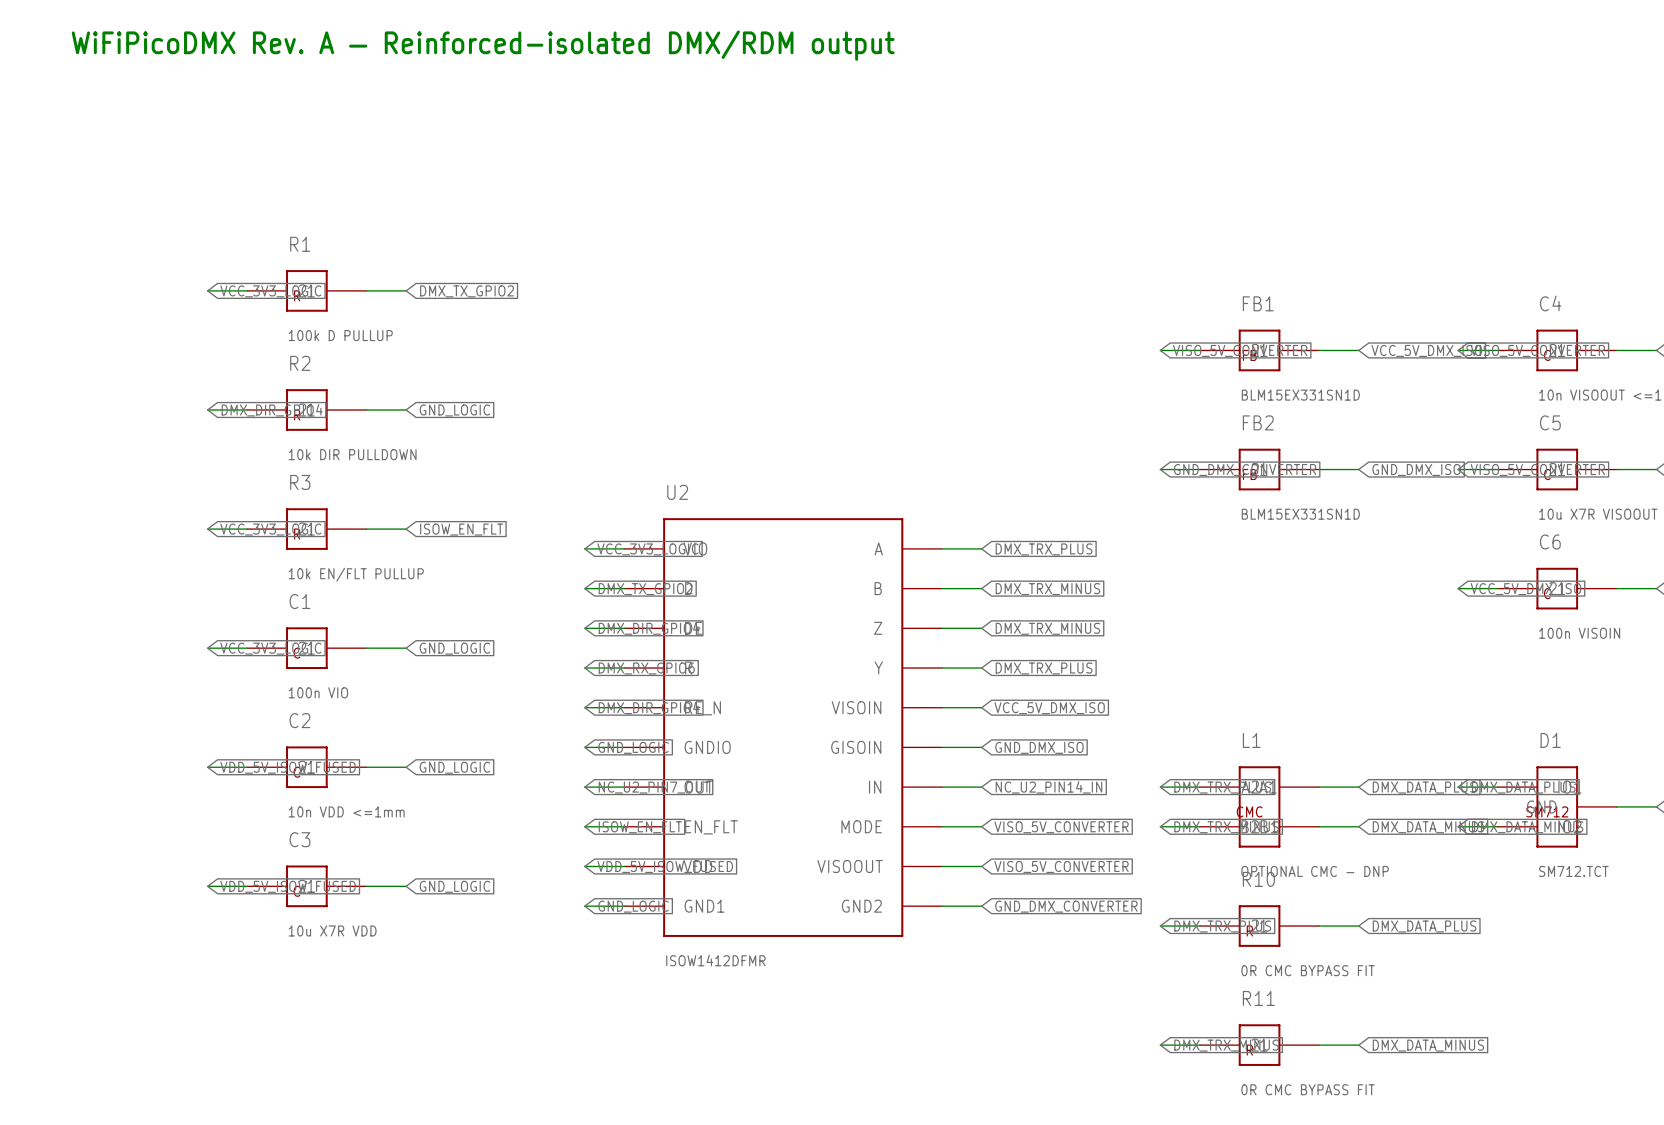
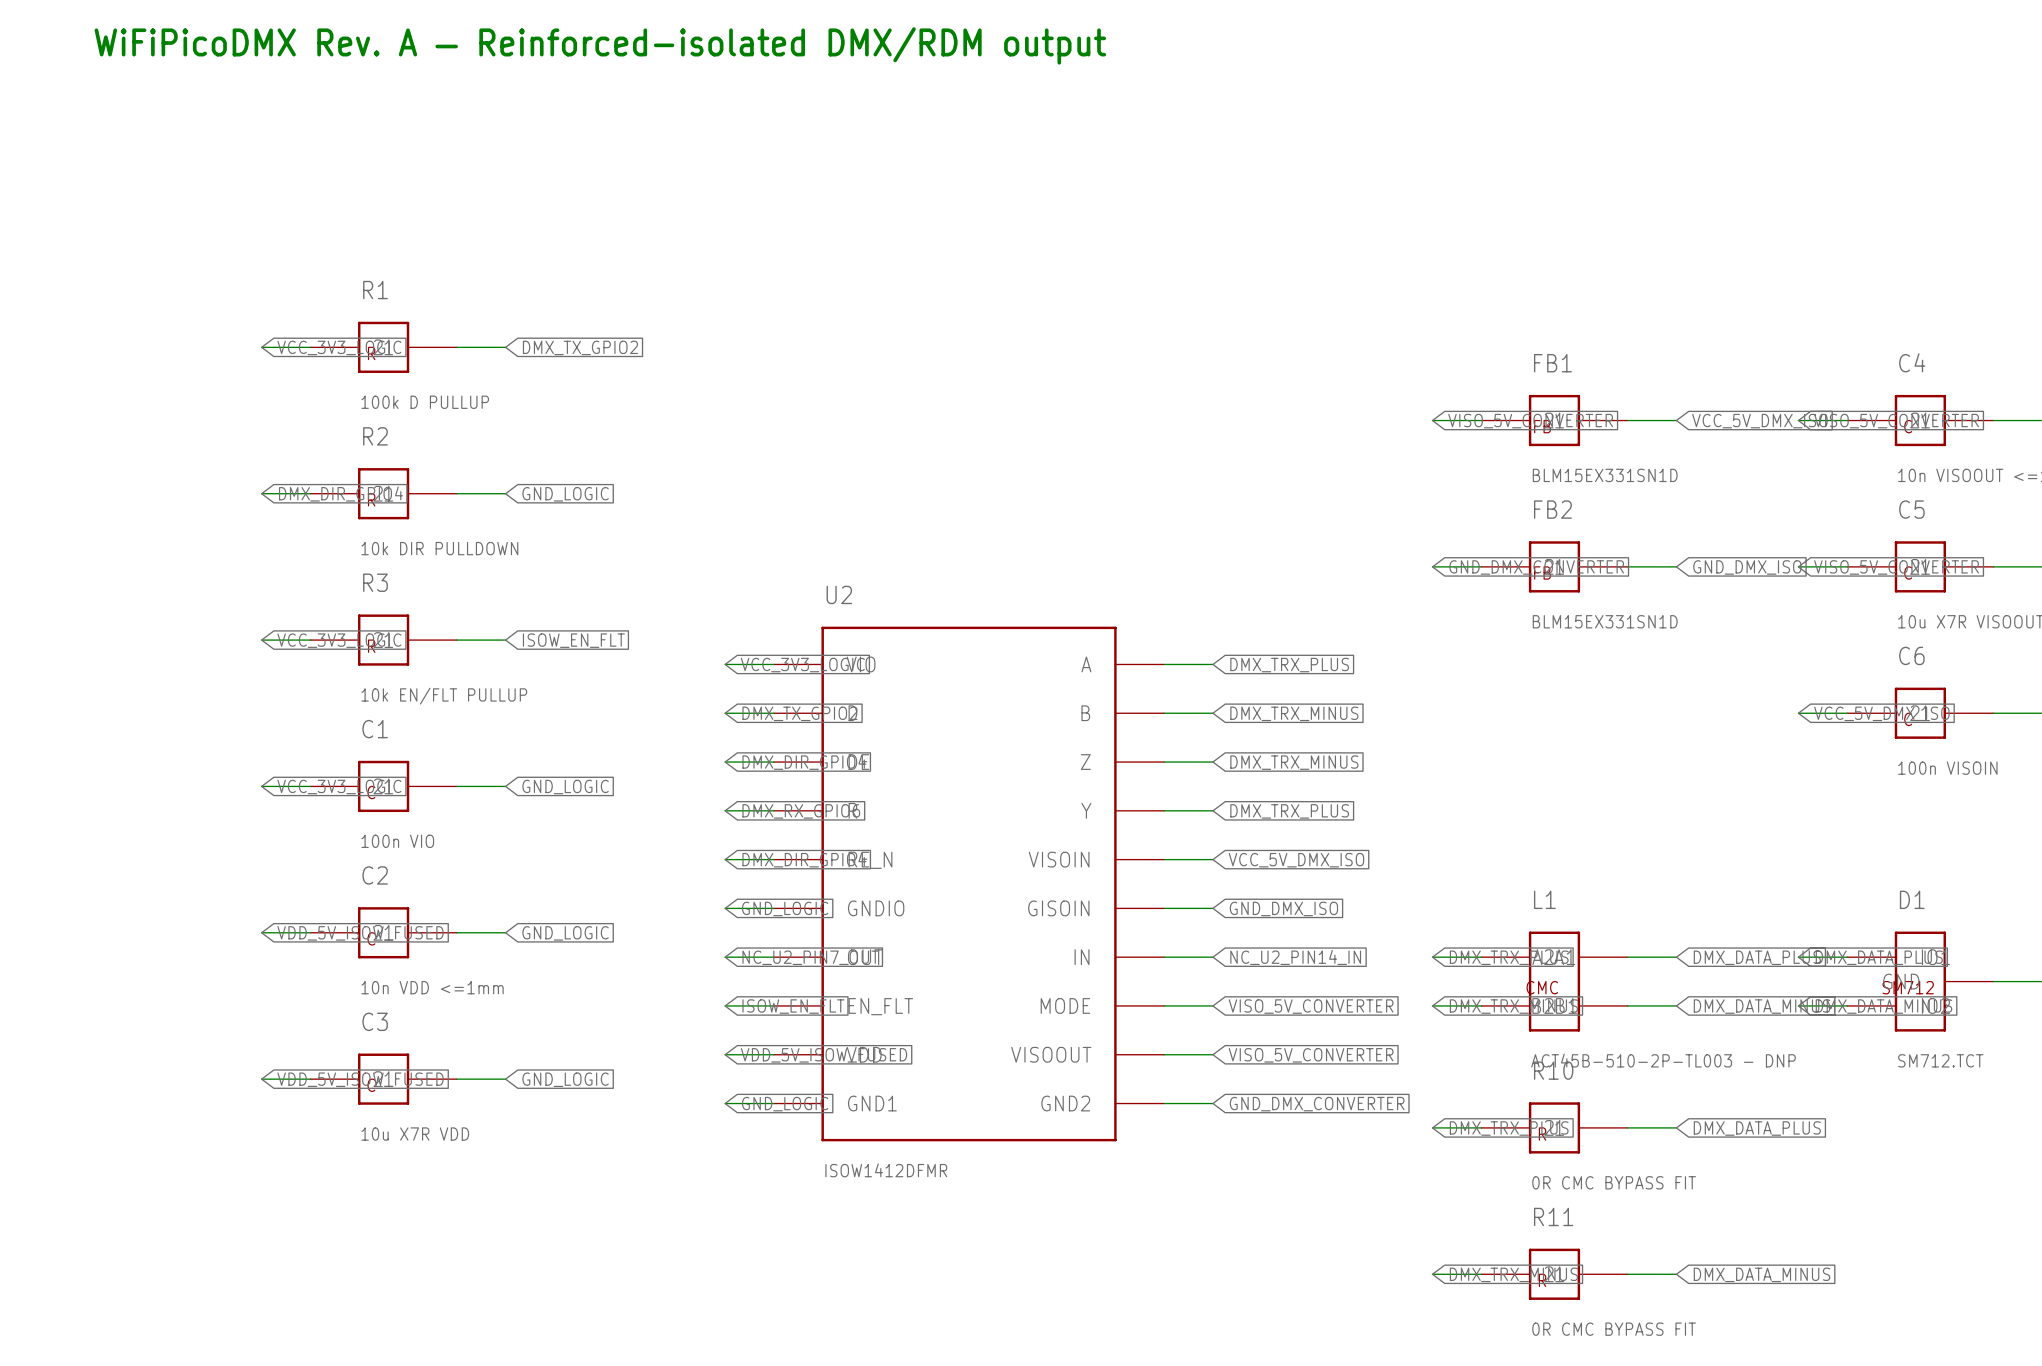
L1 value: OPTIONAL CMC - DNP (1315, 871) -> ACT45B-510-2P-TL003 - DNP (1663, 1060)

